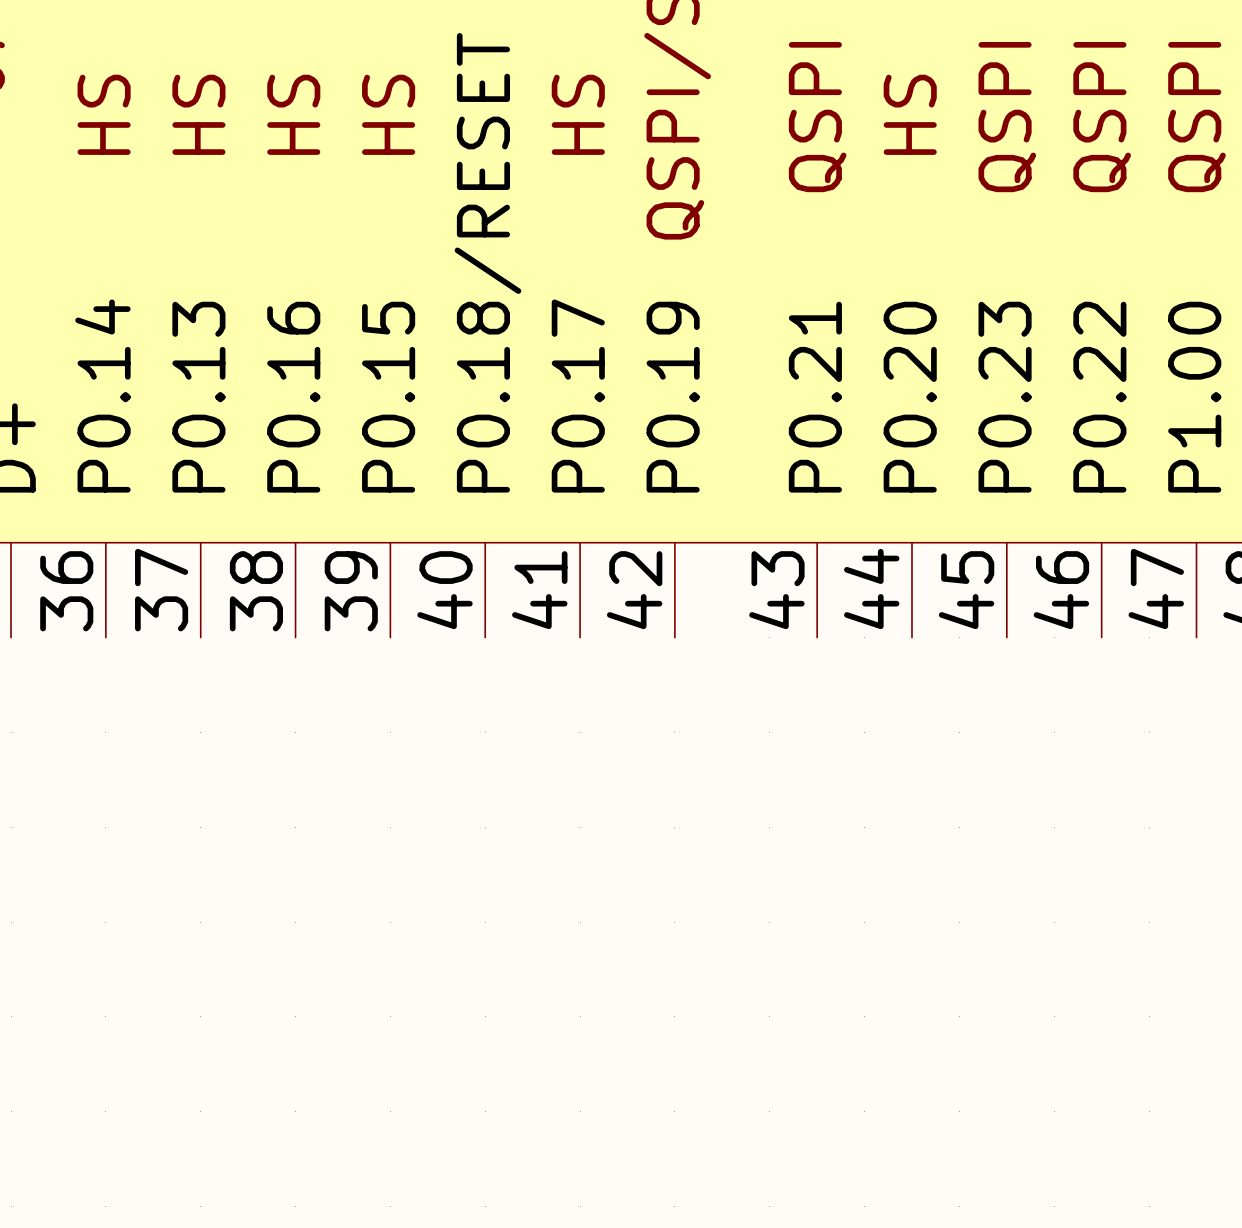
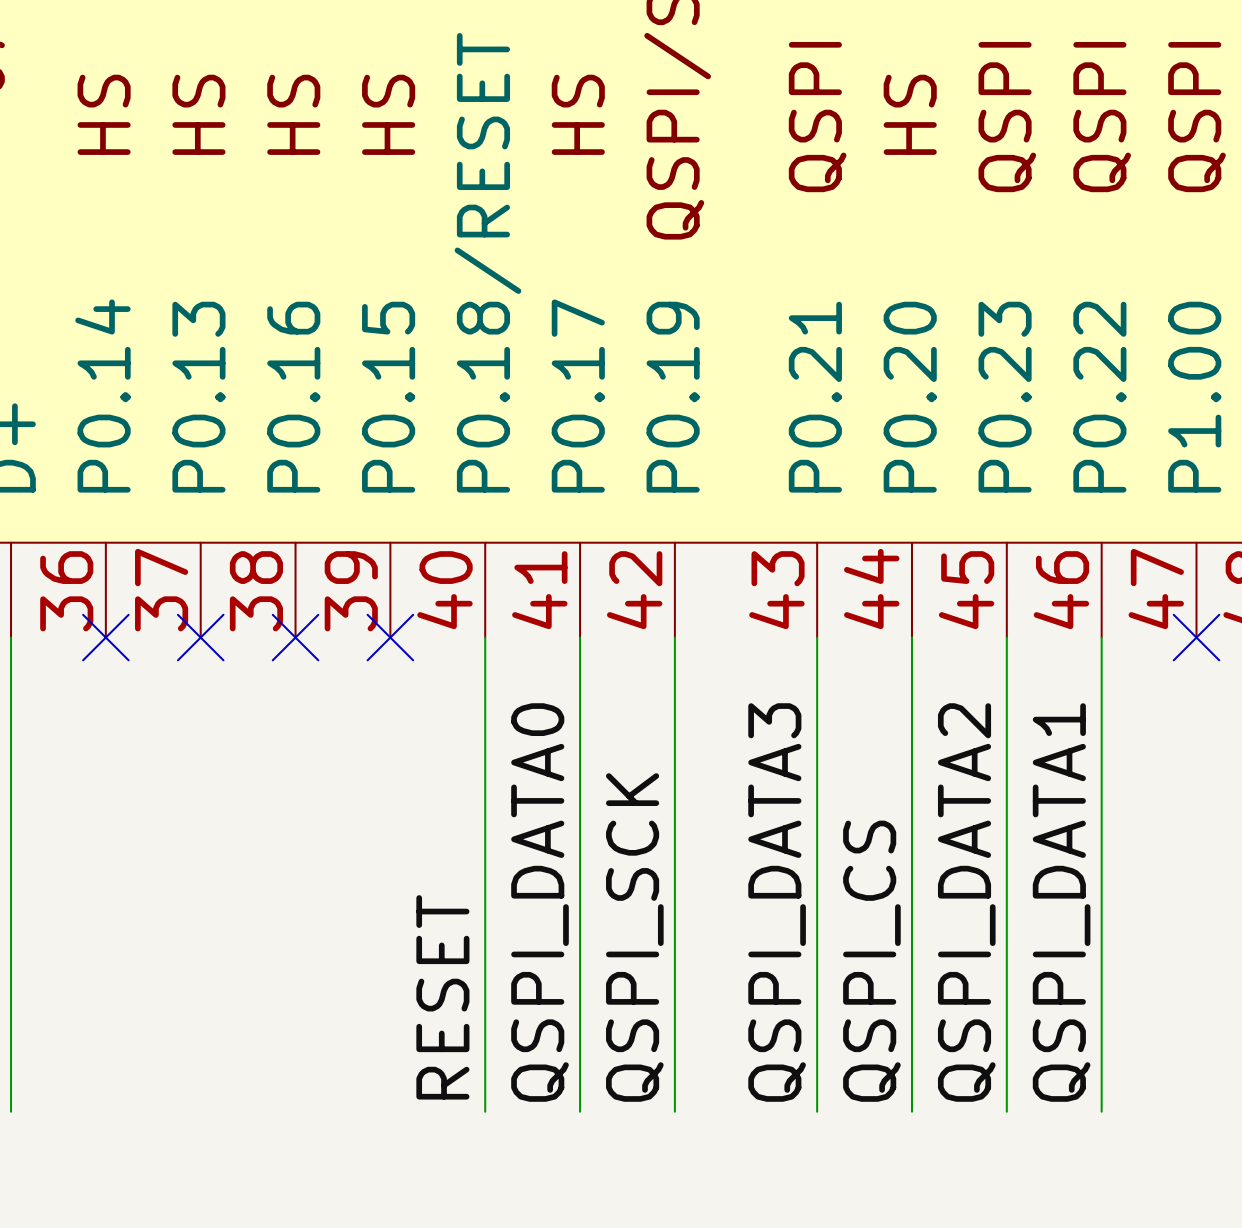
wire: none -> (11, 637) (11, 1111)
no-connect mark: none -> (105, 637)
no-connect mark: none -> (200, 637)
no-connect mark: none -> (295, 637)
no-connect mark: none -> (390, 637)
wire: none -> (485, 637) (485, 1111)
wire: none -> (580, 637) (580, 1111)
wire: none -> (674, 637) (674, 1111)
wire: none -> (817, 637) (817, 1111)
wire: none -> (911, 637) (911, 1111)
wire: none -> (1006, 637) (1006, 1111)
wire: none -> (1101, 637) (1101, 1111)
no-connect mark: none -> (1196, 637)
label: none -> QSPI_DATA0 (540, 902)
label: none -> QSPI_DATA3 (777, 902)
label: none -> QSPI_DATA2 (966, 902)
label: none -> QSPI_DATA1 (1061, 902)
label: none -> QSPI_SCK (634, 937)
label: none -> QSPI_CS (871, 961)
label: none -> RESET (442, 997)

